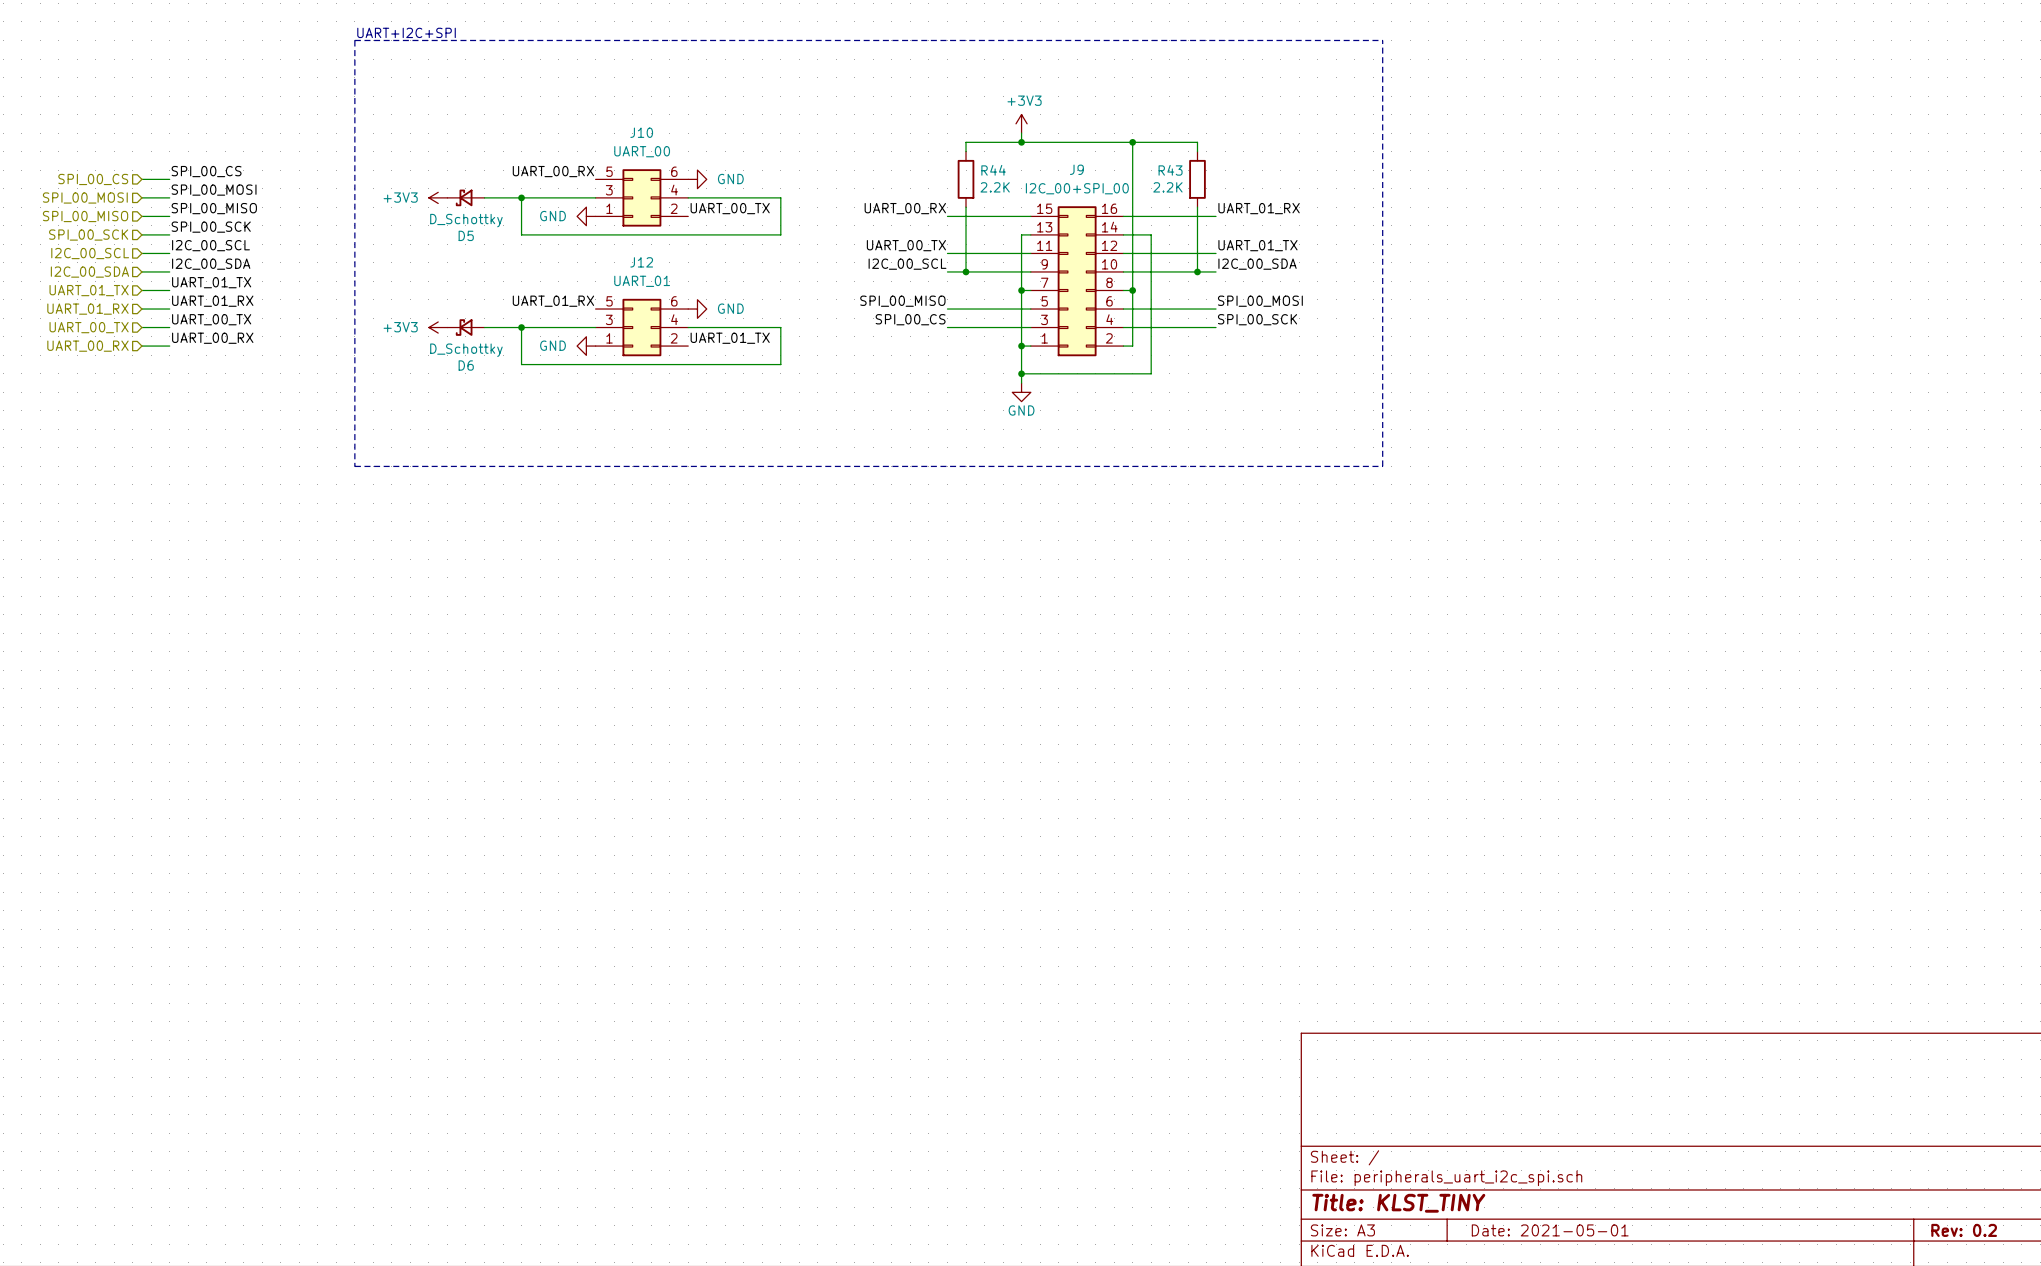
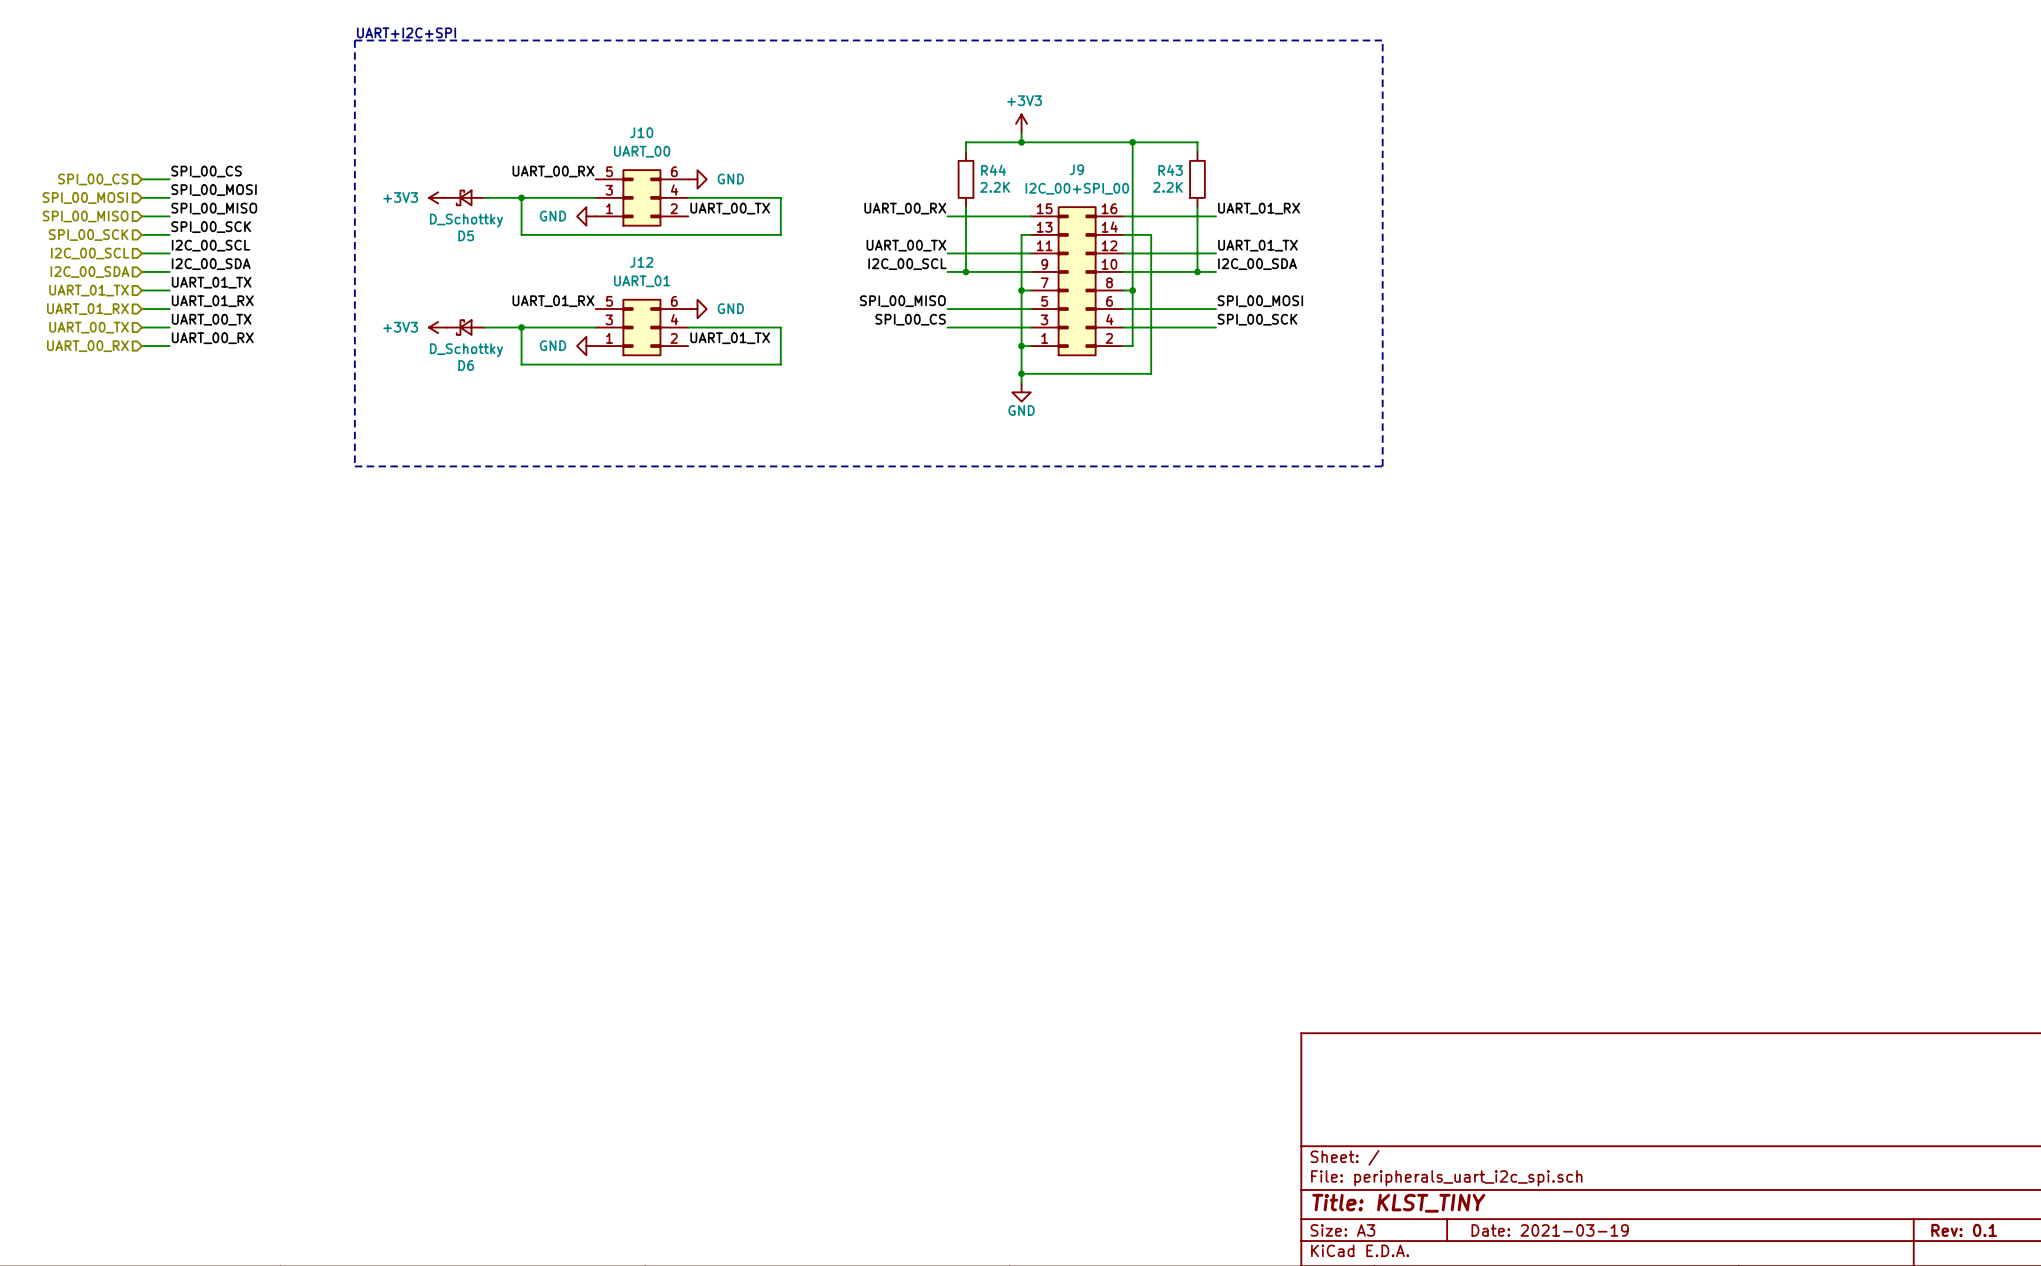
title block: Date: 2021-05-01 (1550, 1230) -> Date: 2021-03-19 (1550, 1230)
title block: Rev: 0.2 (1964, 1230) -> Rev: 0.1 (1964, 1230)

